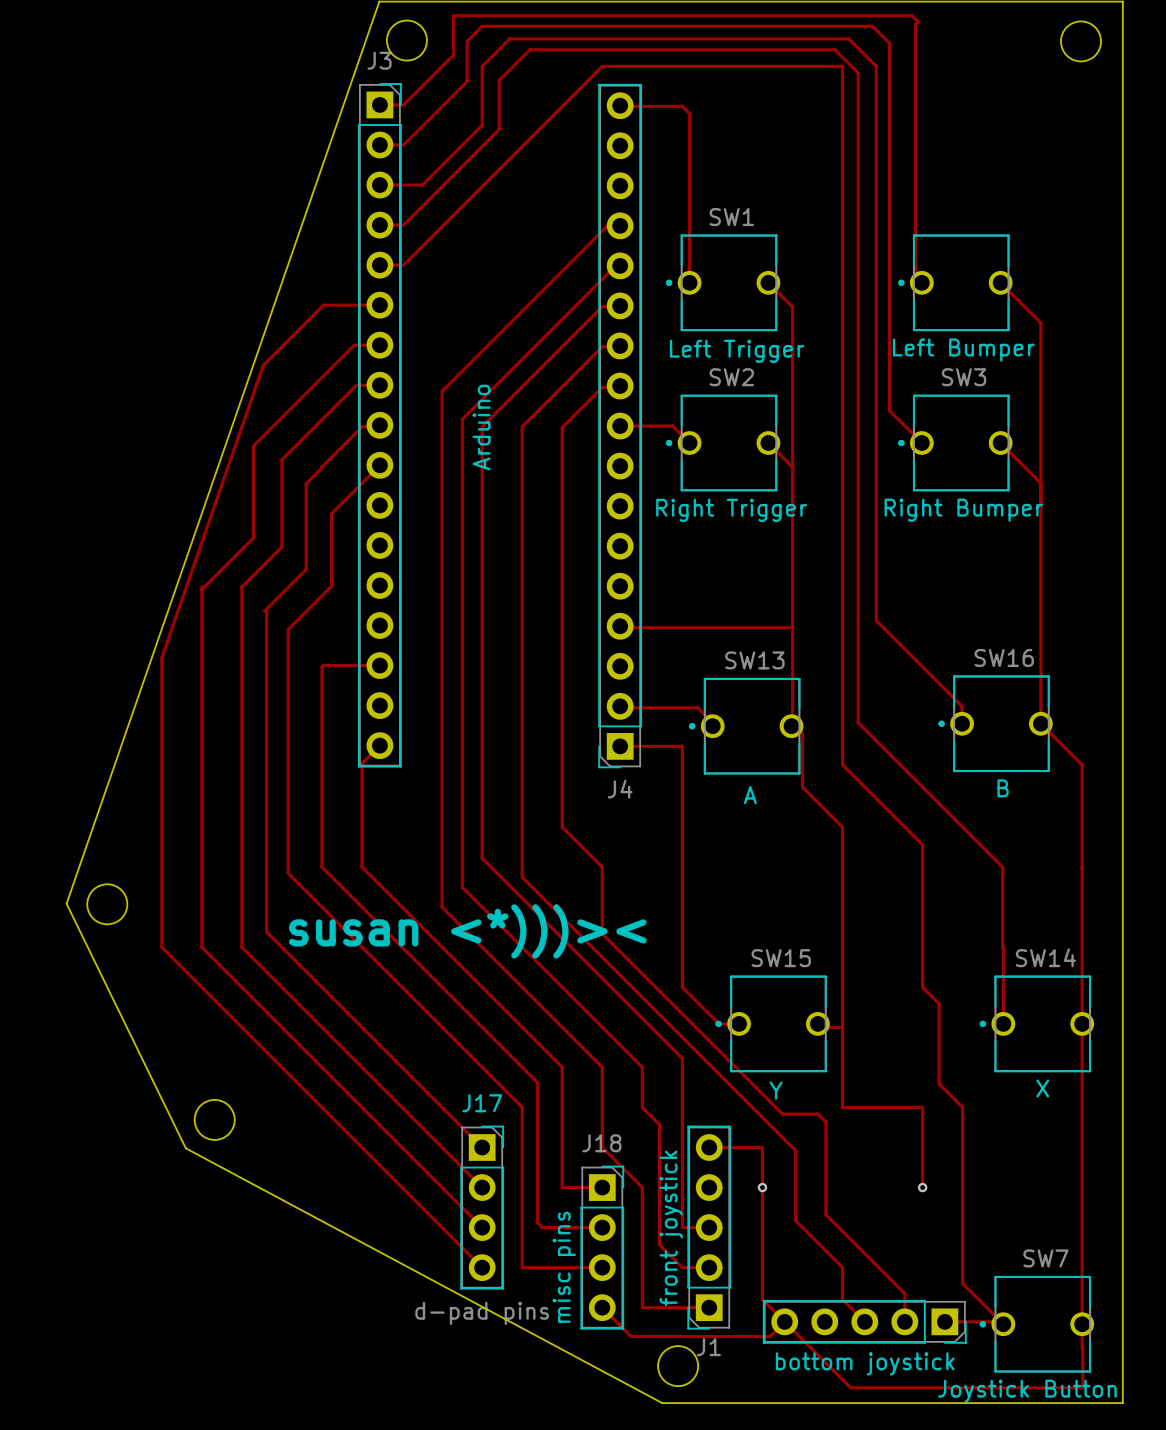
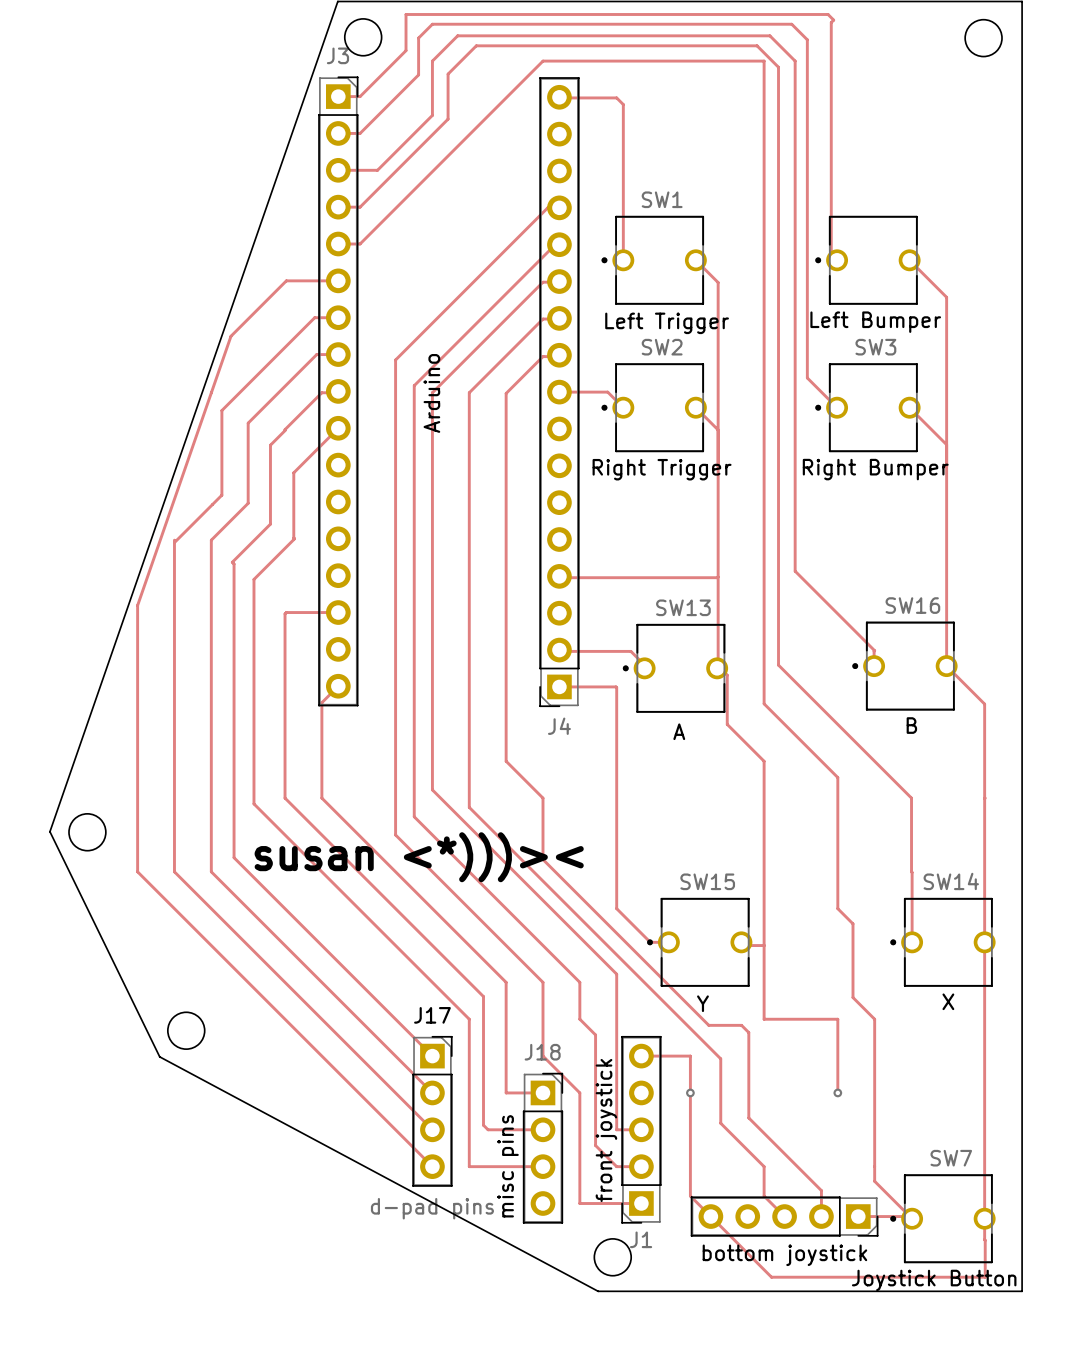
track: (602, 1307) (631, 1336) (770, 1336) (784, 1321) -> none

